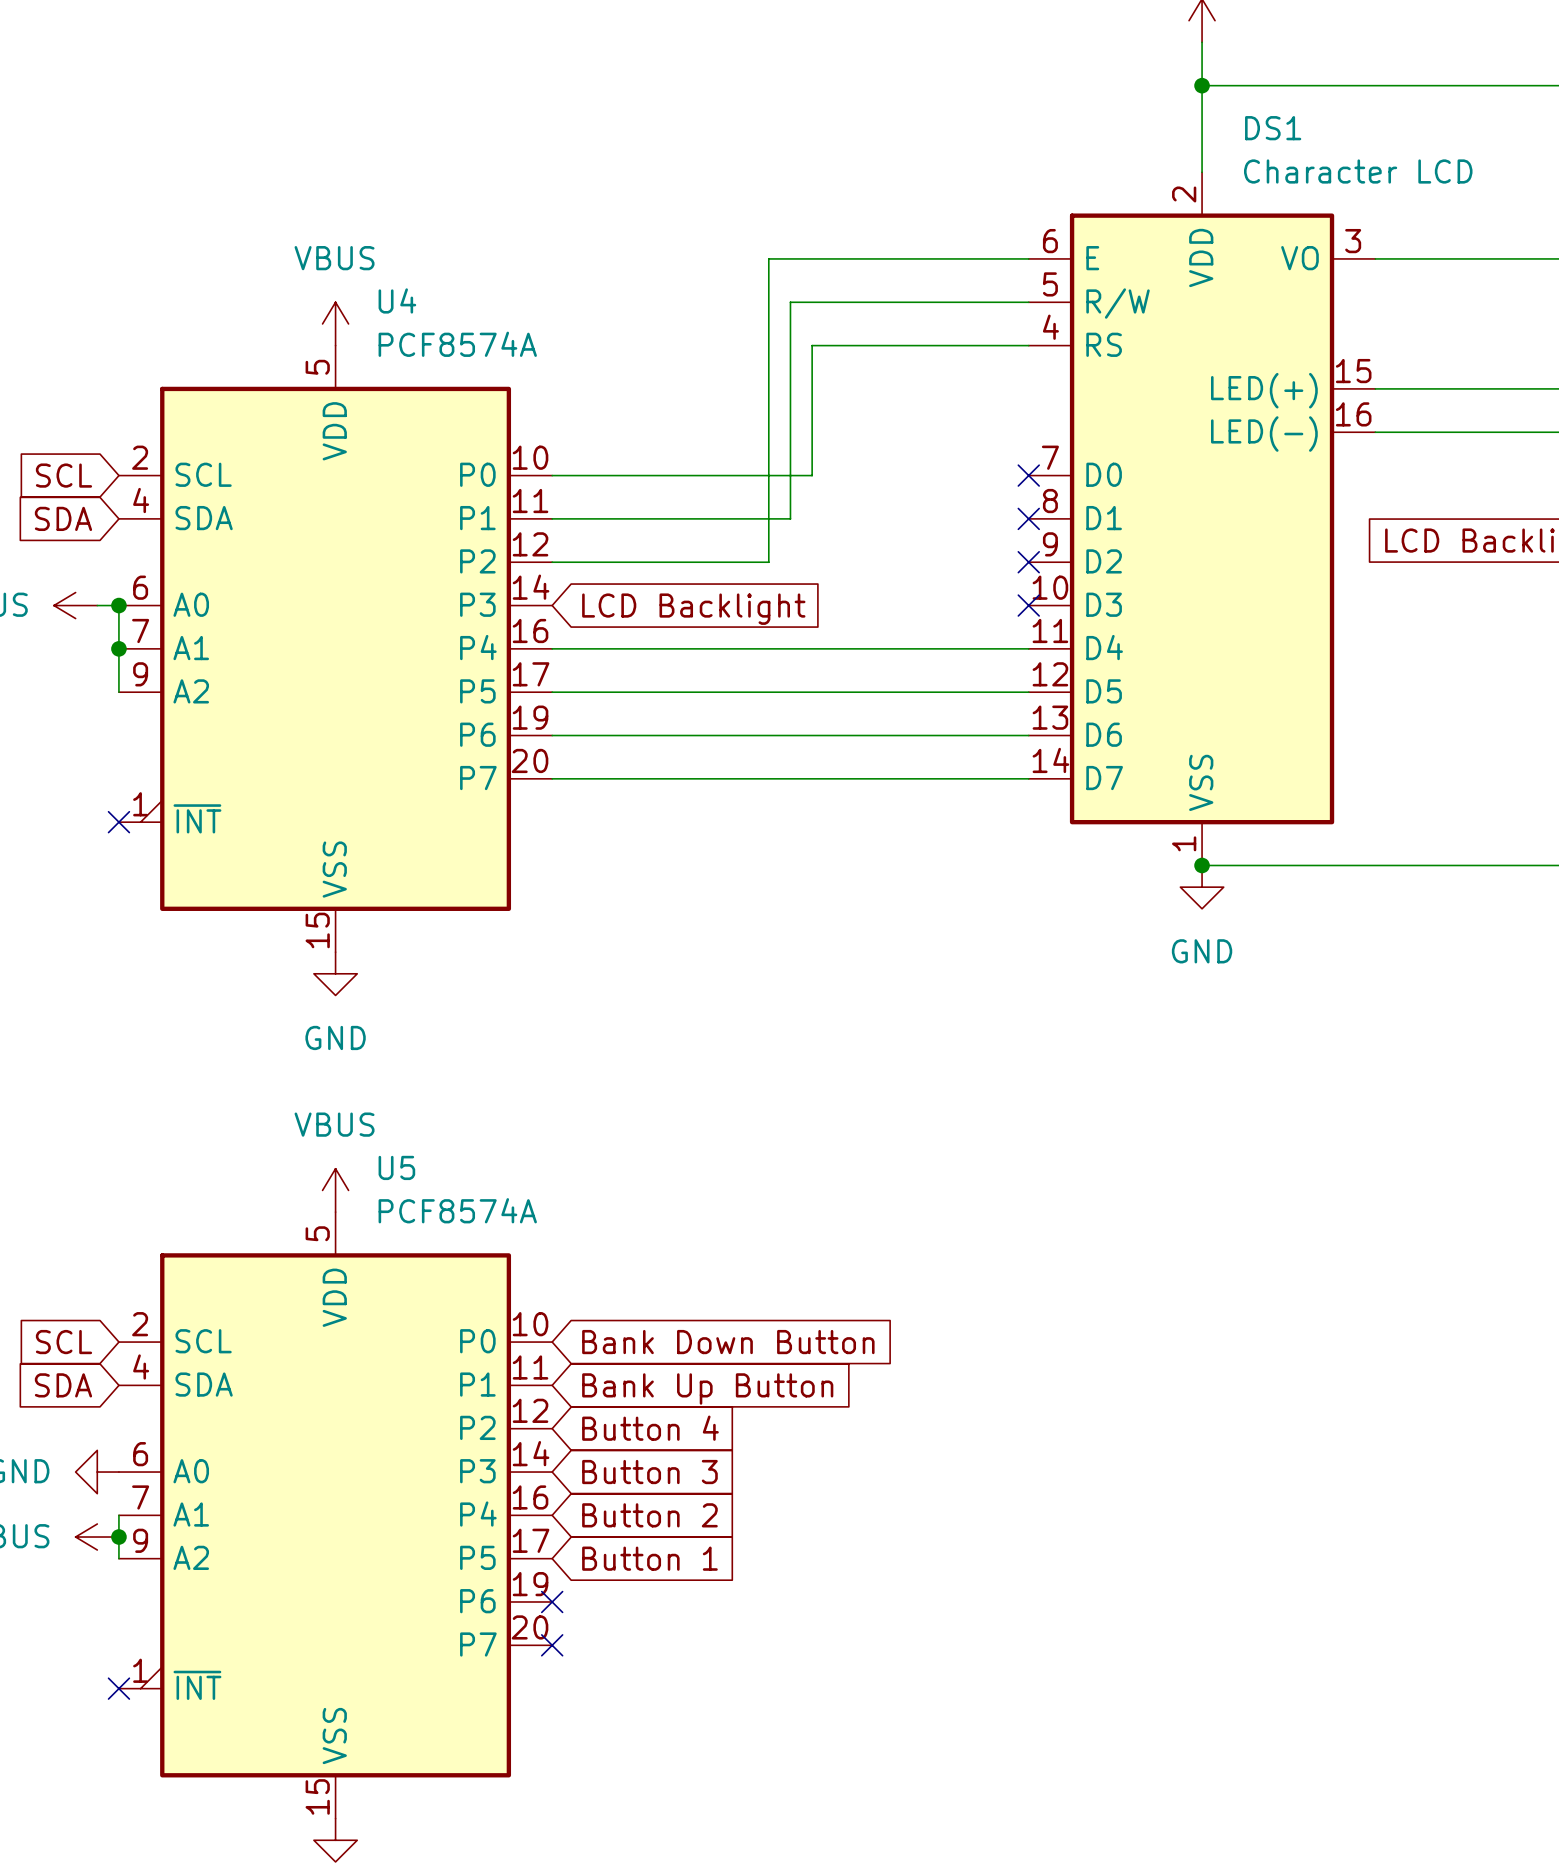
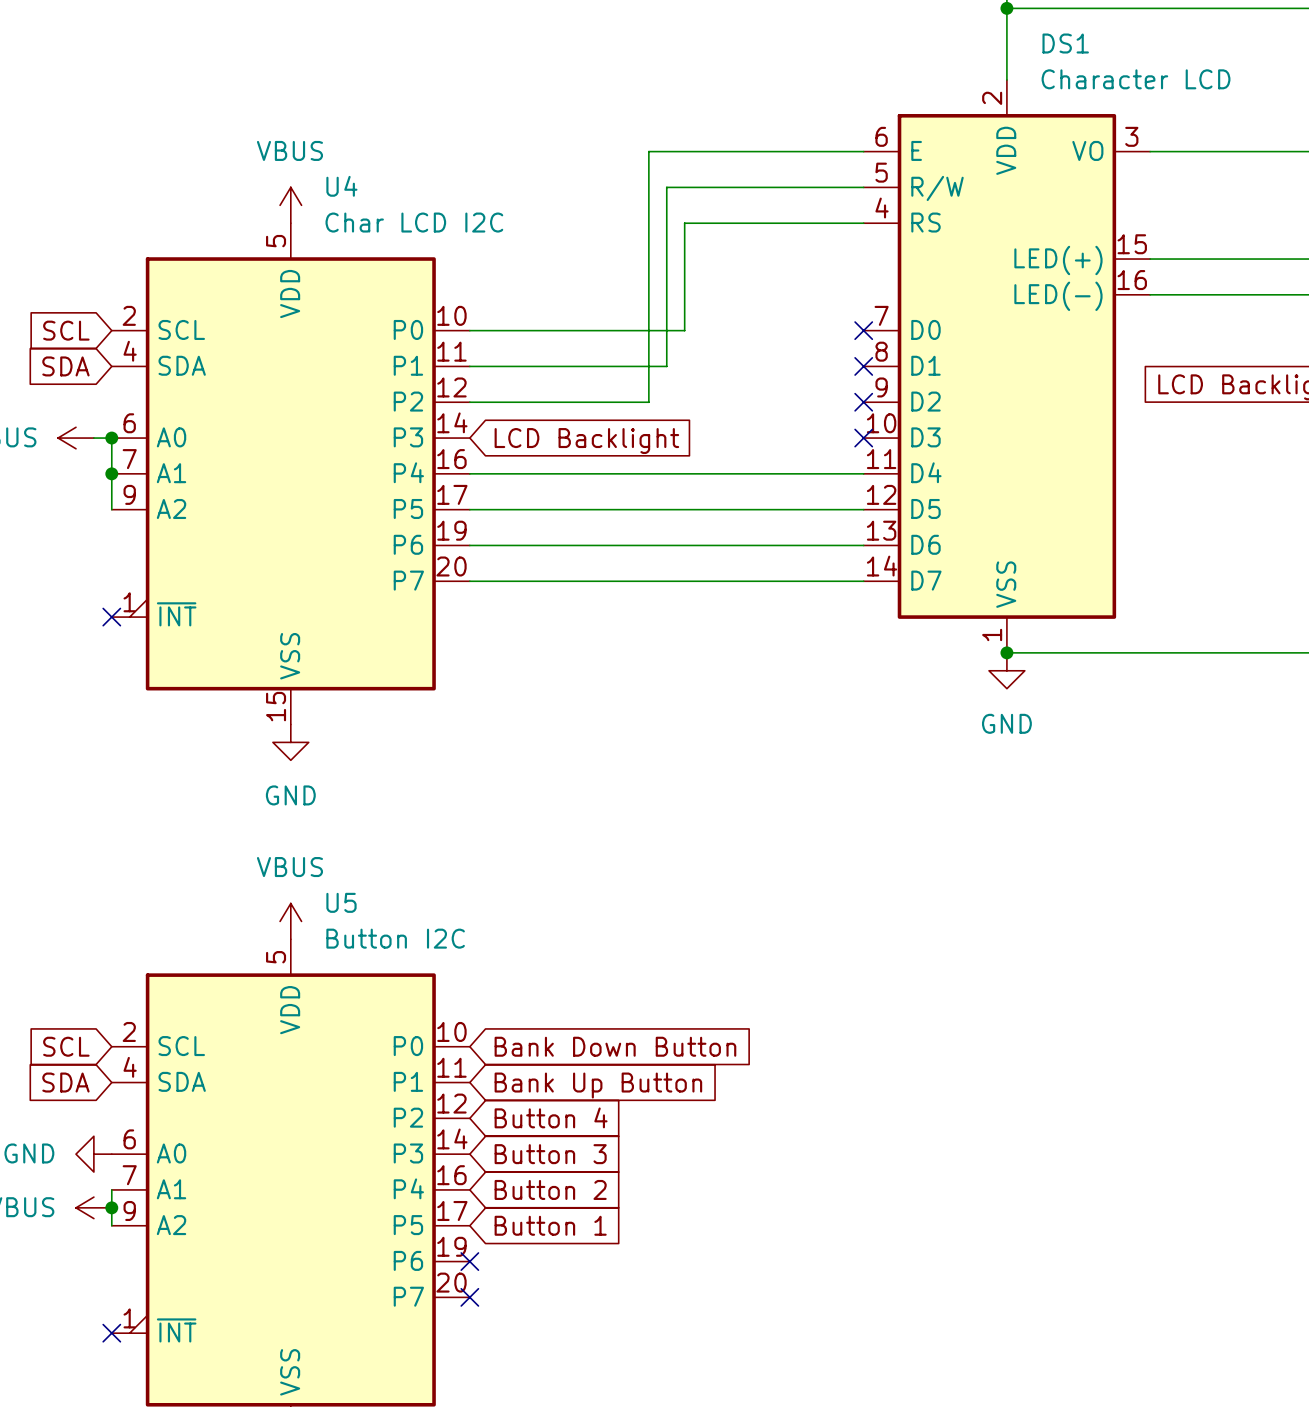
U4 value: PCF8574A (457, 344) -> Char LCD I2C (414, 222)
U5 value: PCF8574A (457, 1210) -> Button I2C (395, 938)

